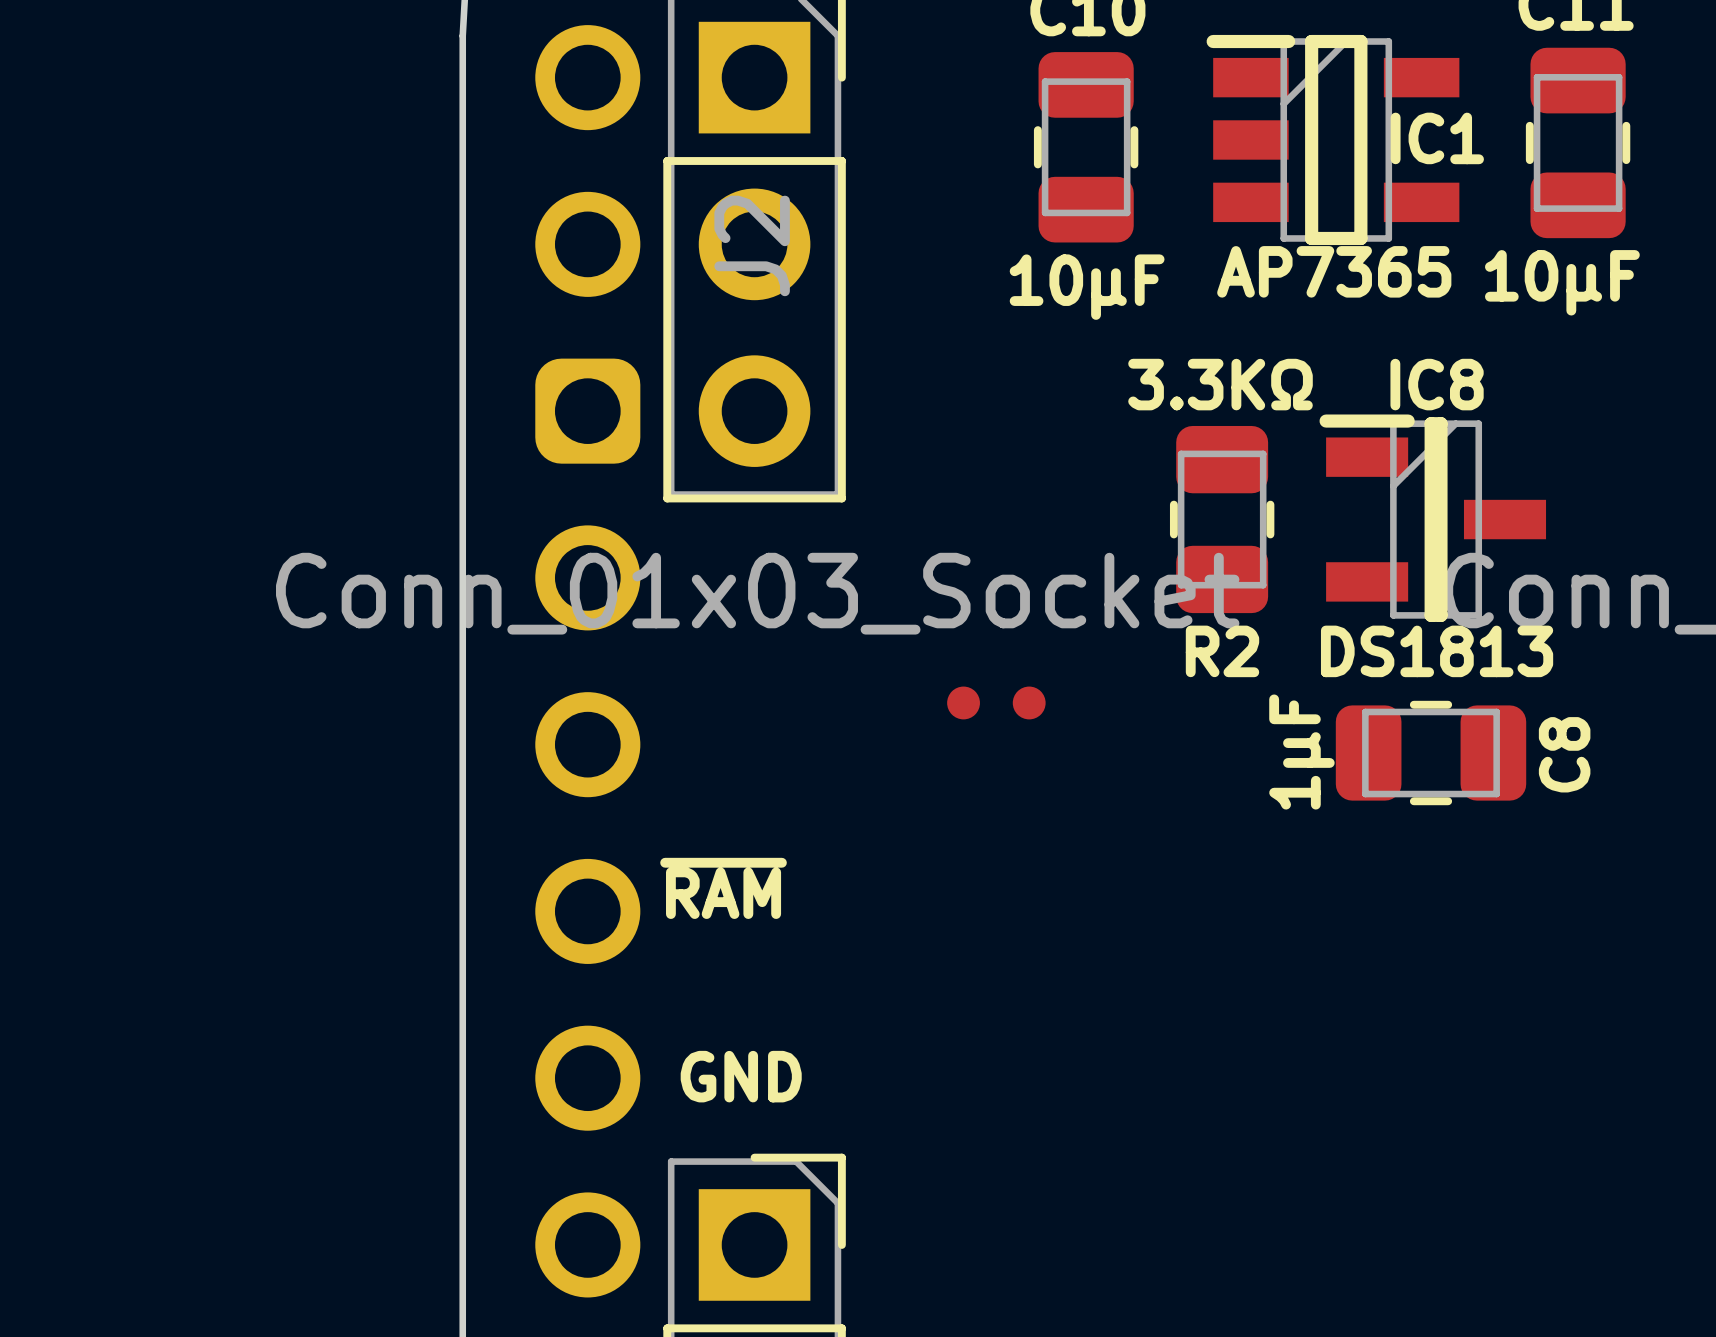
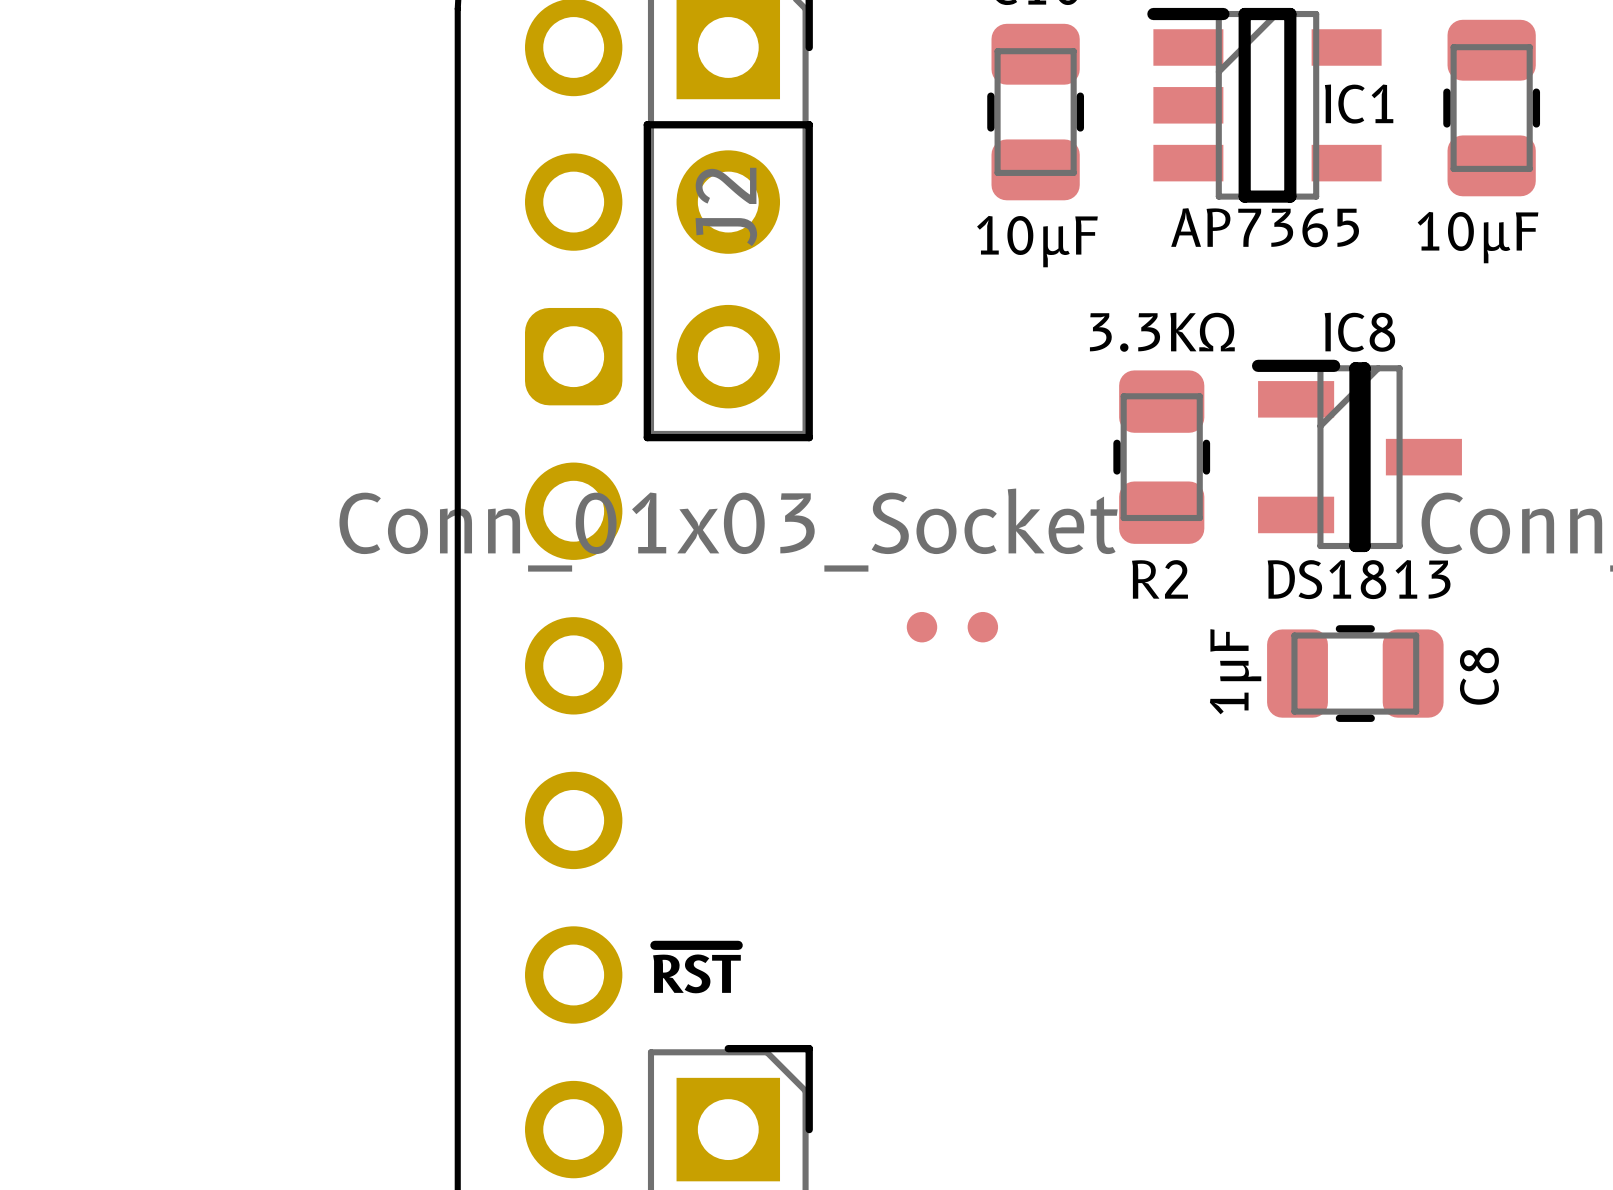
text: ~{RAM} (723, 888) -> none
text: GND (741, 1076) -> ~{RST} (696, 969)

